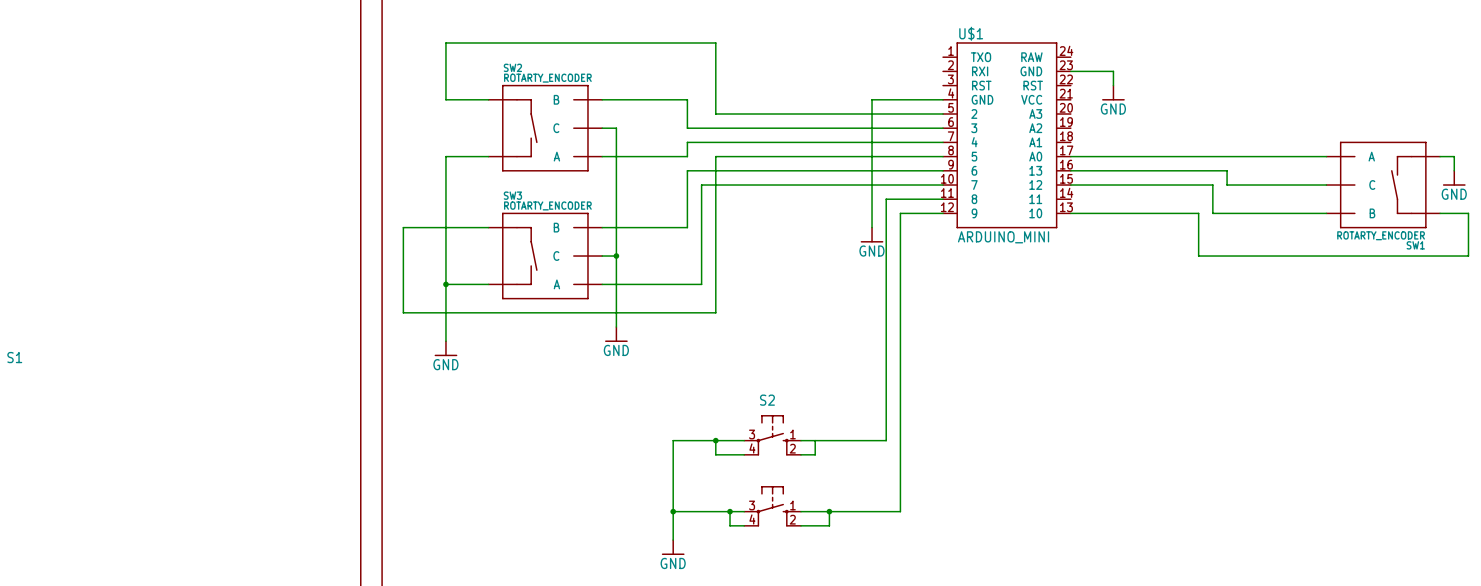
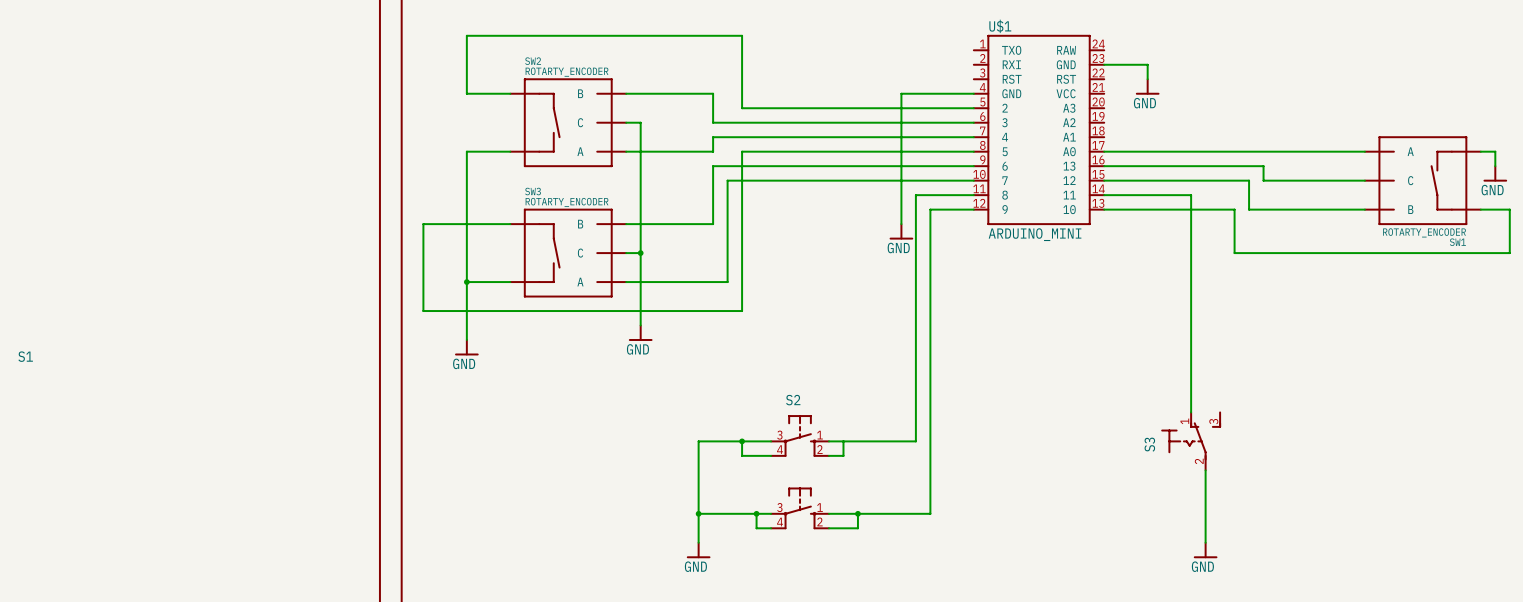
wire: none -> (1104, 195) (1191, 195) (1191, 412)
S3: none -> (1191, 441)
wire: none -> (1205, 470) (1205, 542)
power symbol: none -> GND (1205, 550)

